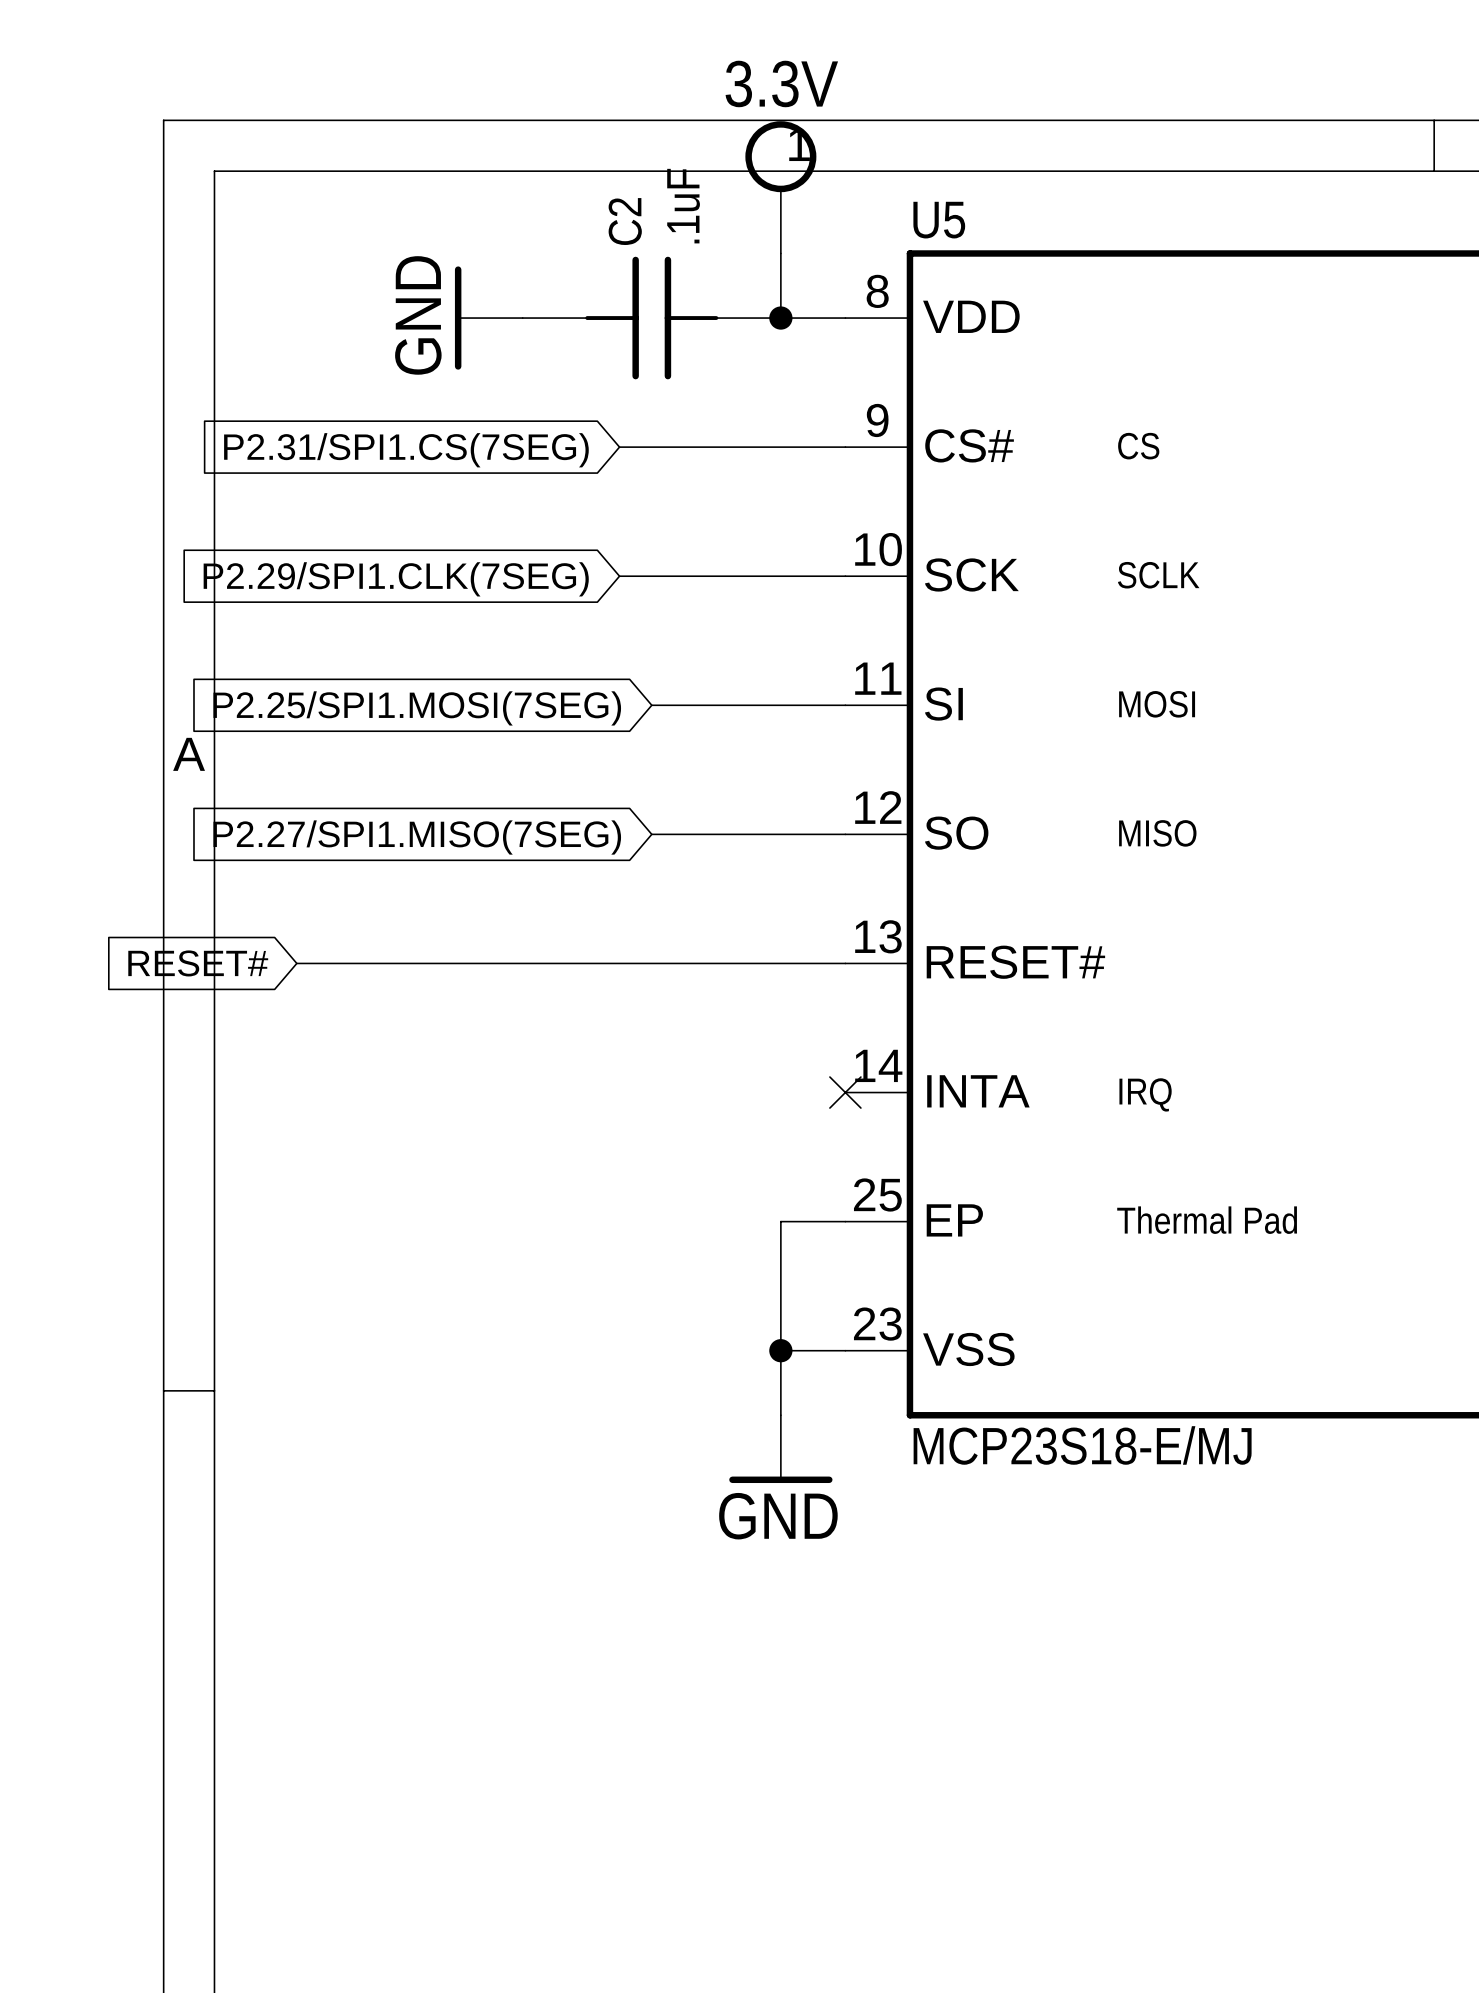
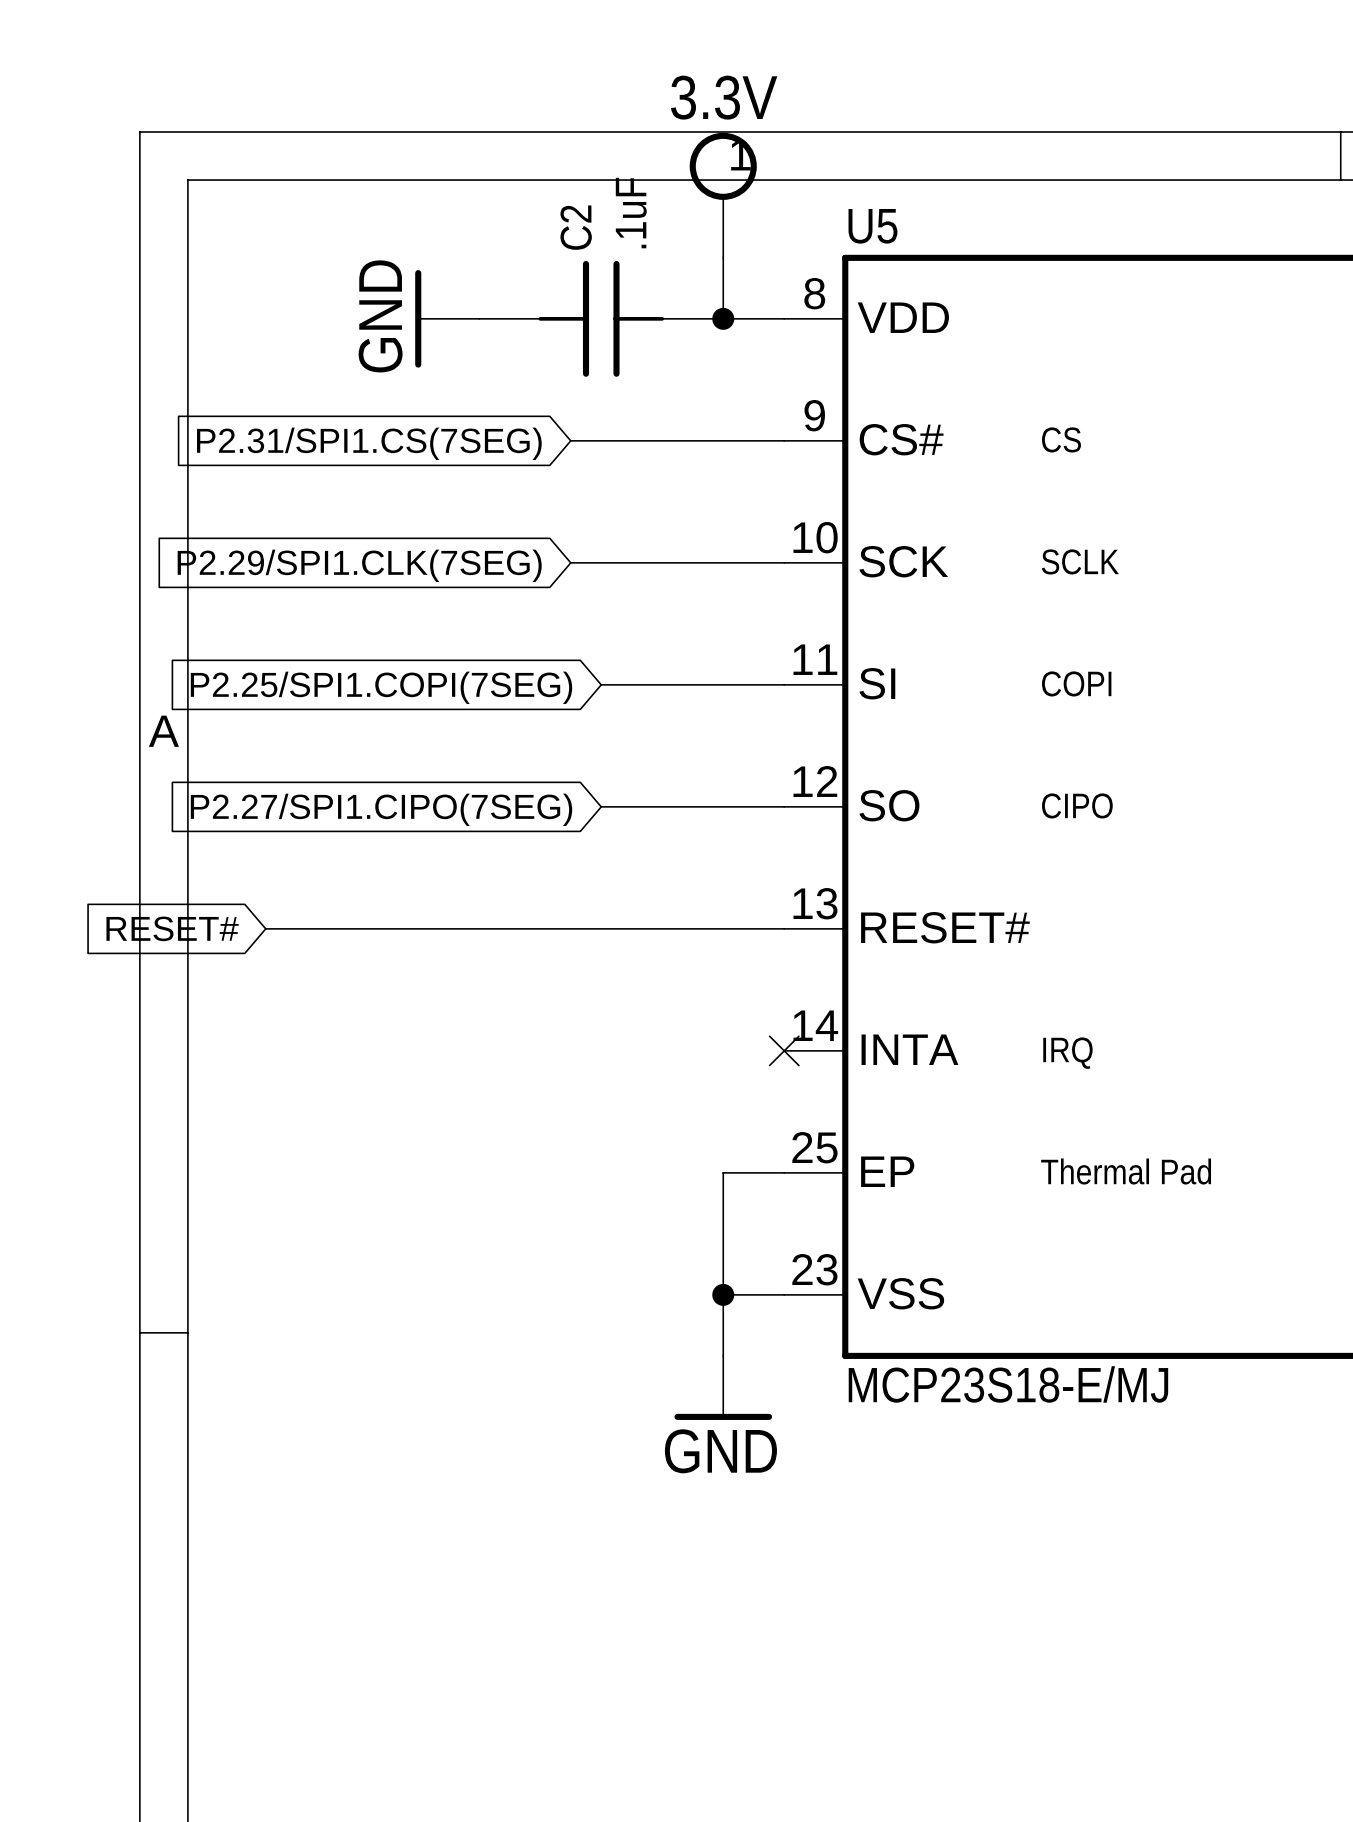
U5 text: MOSI (1157, 704) -> COPI (1076, 683)
global label: P2.25/SPI1.MOSI(7SEG) (417, 708) -> P2.25/SPI1.COPI(7SEG) (381, 687)
U5 text: MISO (1157, 833) -> CIPO (1077, 805)
global label: P2.27/SPI1.MISO(7SEG) (417, 837) -> P2.27/SPI1.CIPO(7SEG) (381, 809)

